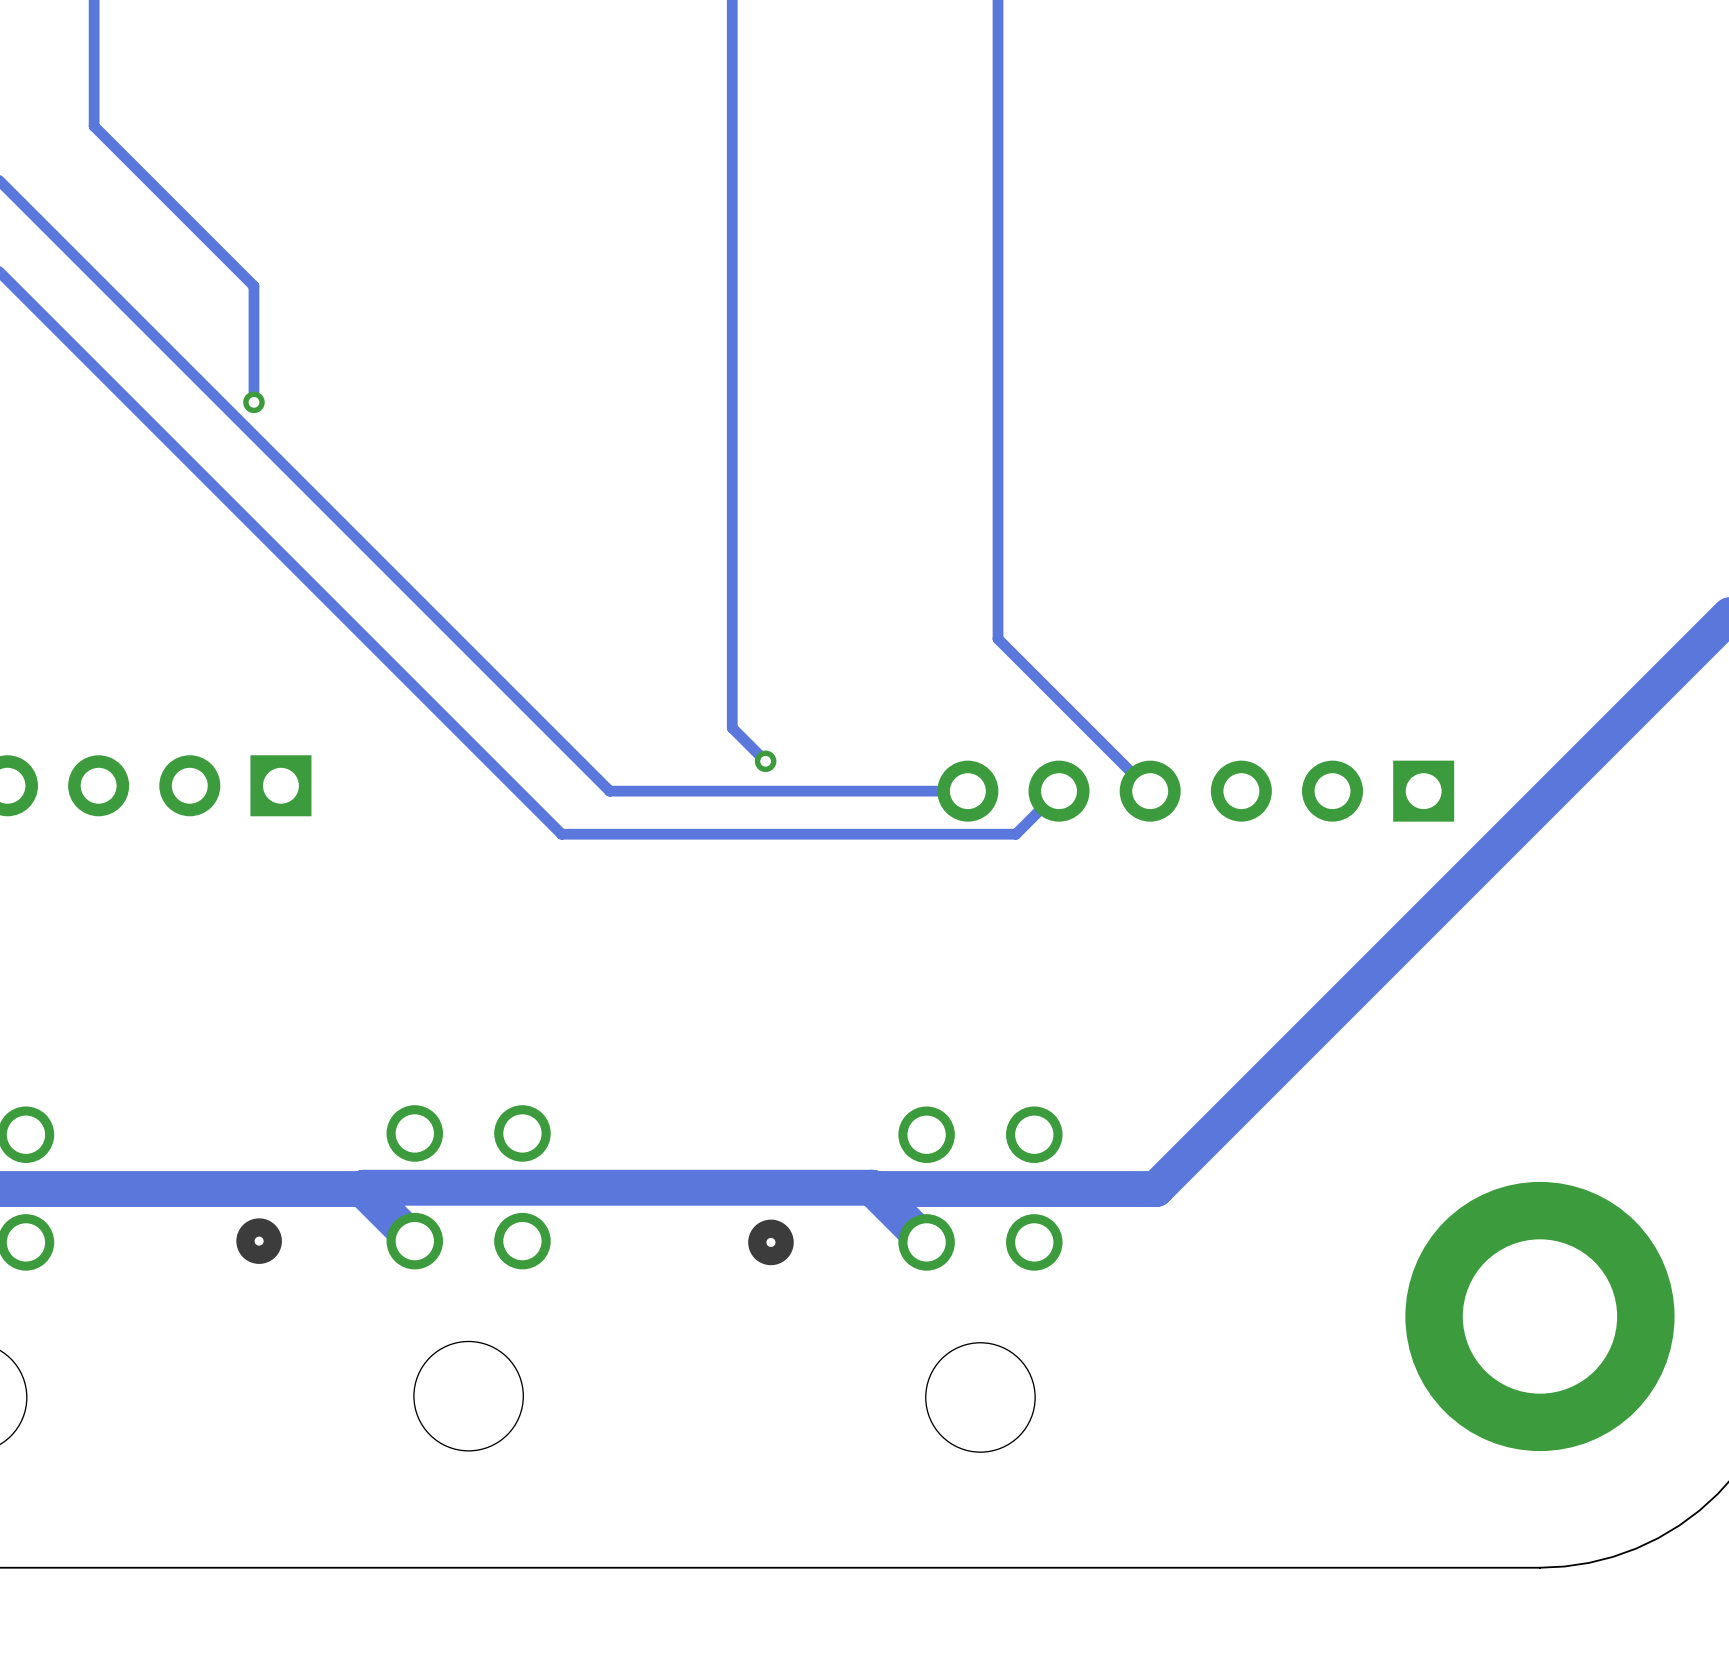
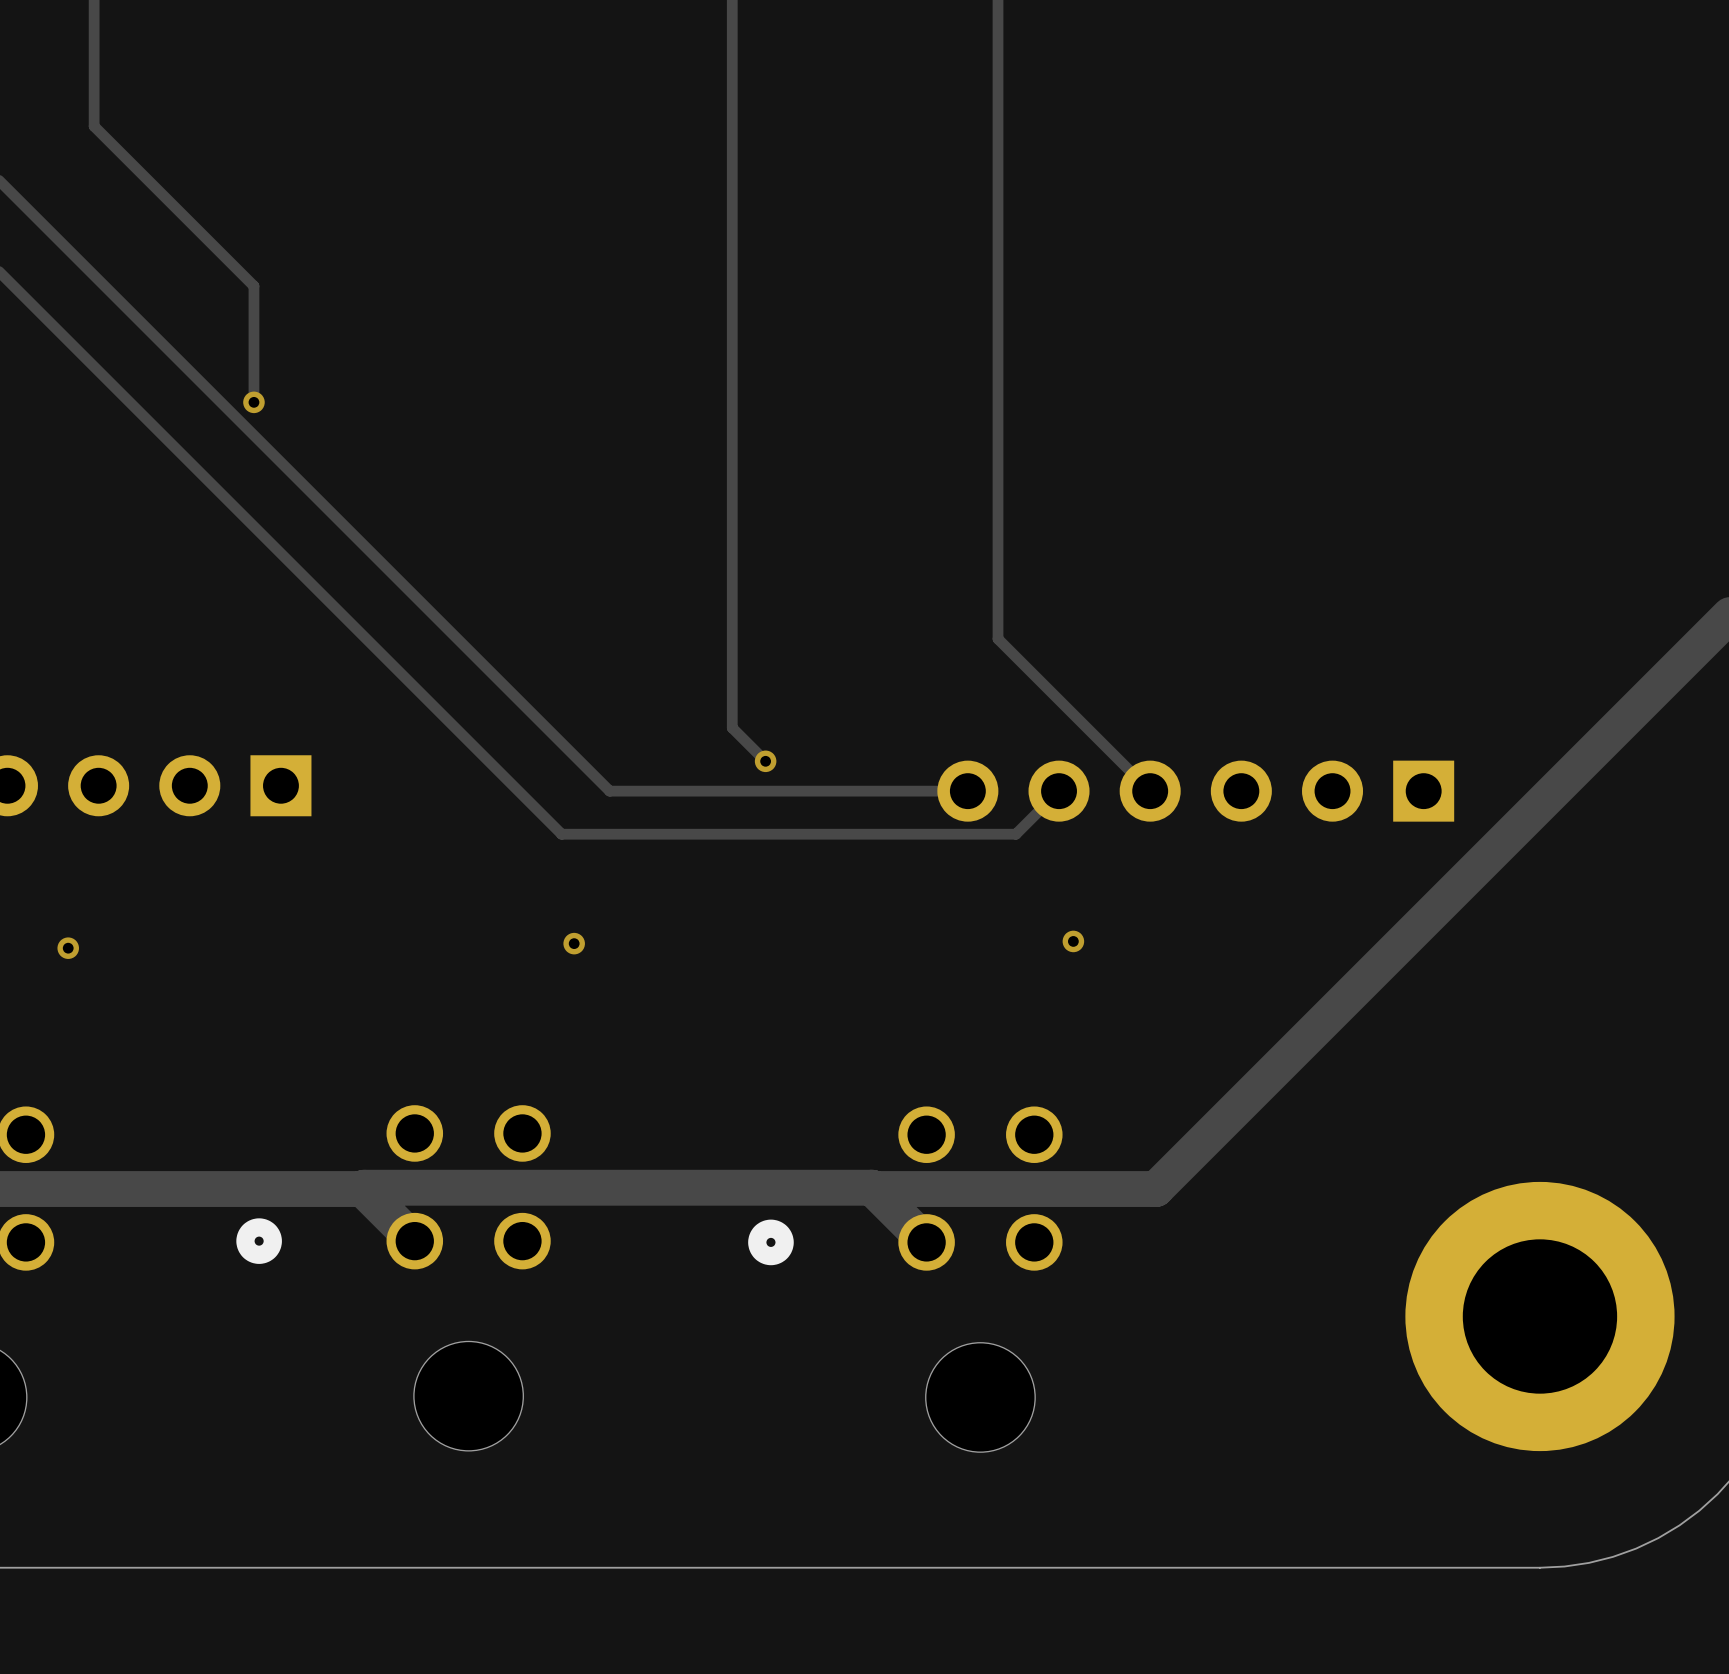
via: none -> (1073, 941)
via: none -> (574, 943)
via: none -> (68, 948)

